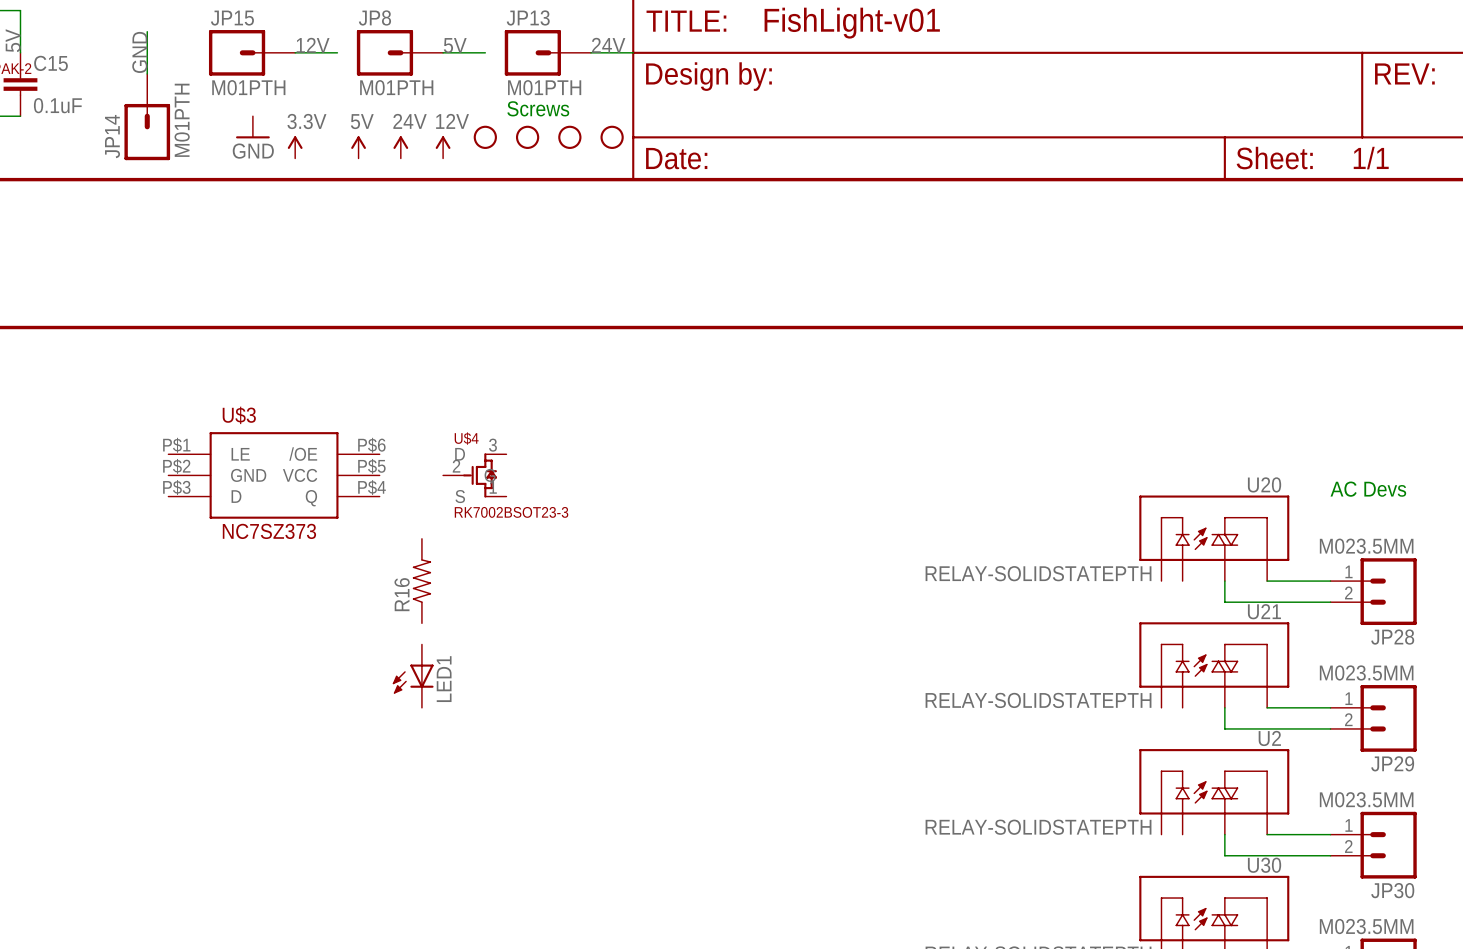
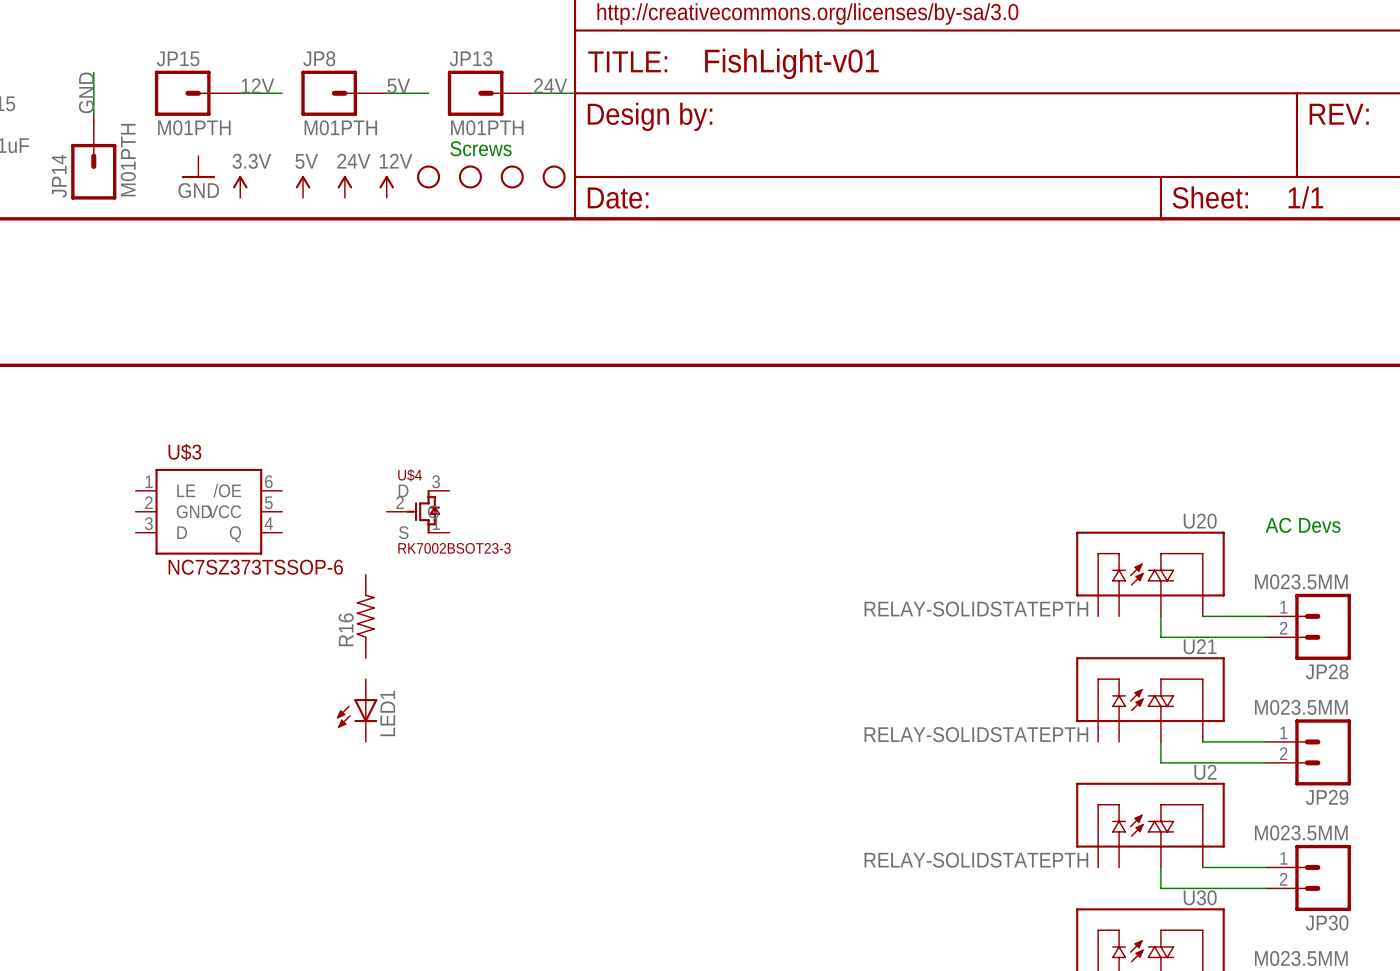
U$3 symbol: [168, 432, 380, 519] -> [135, 468, 283, 555]
U$3 value: NC7SZ373 (269, 531) -> NC7SZ373TSSOP-6 (255, 567)

